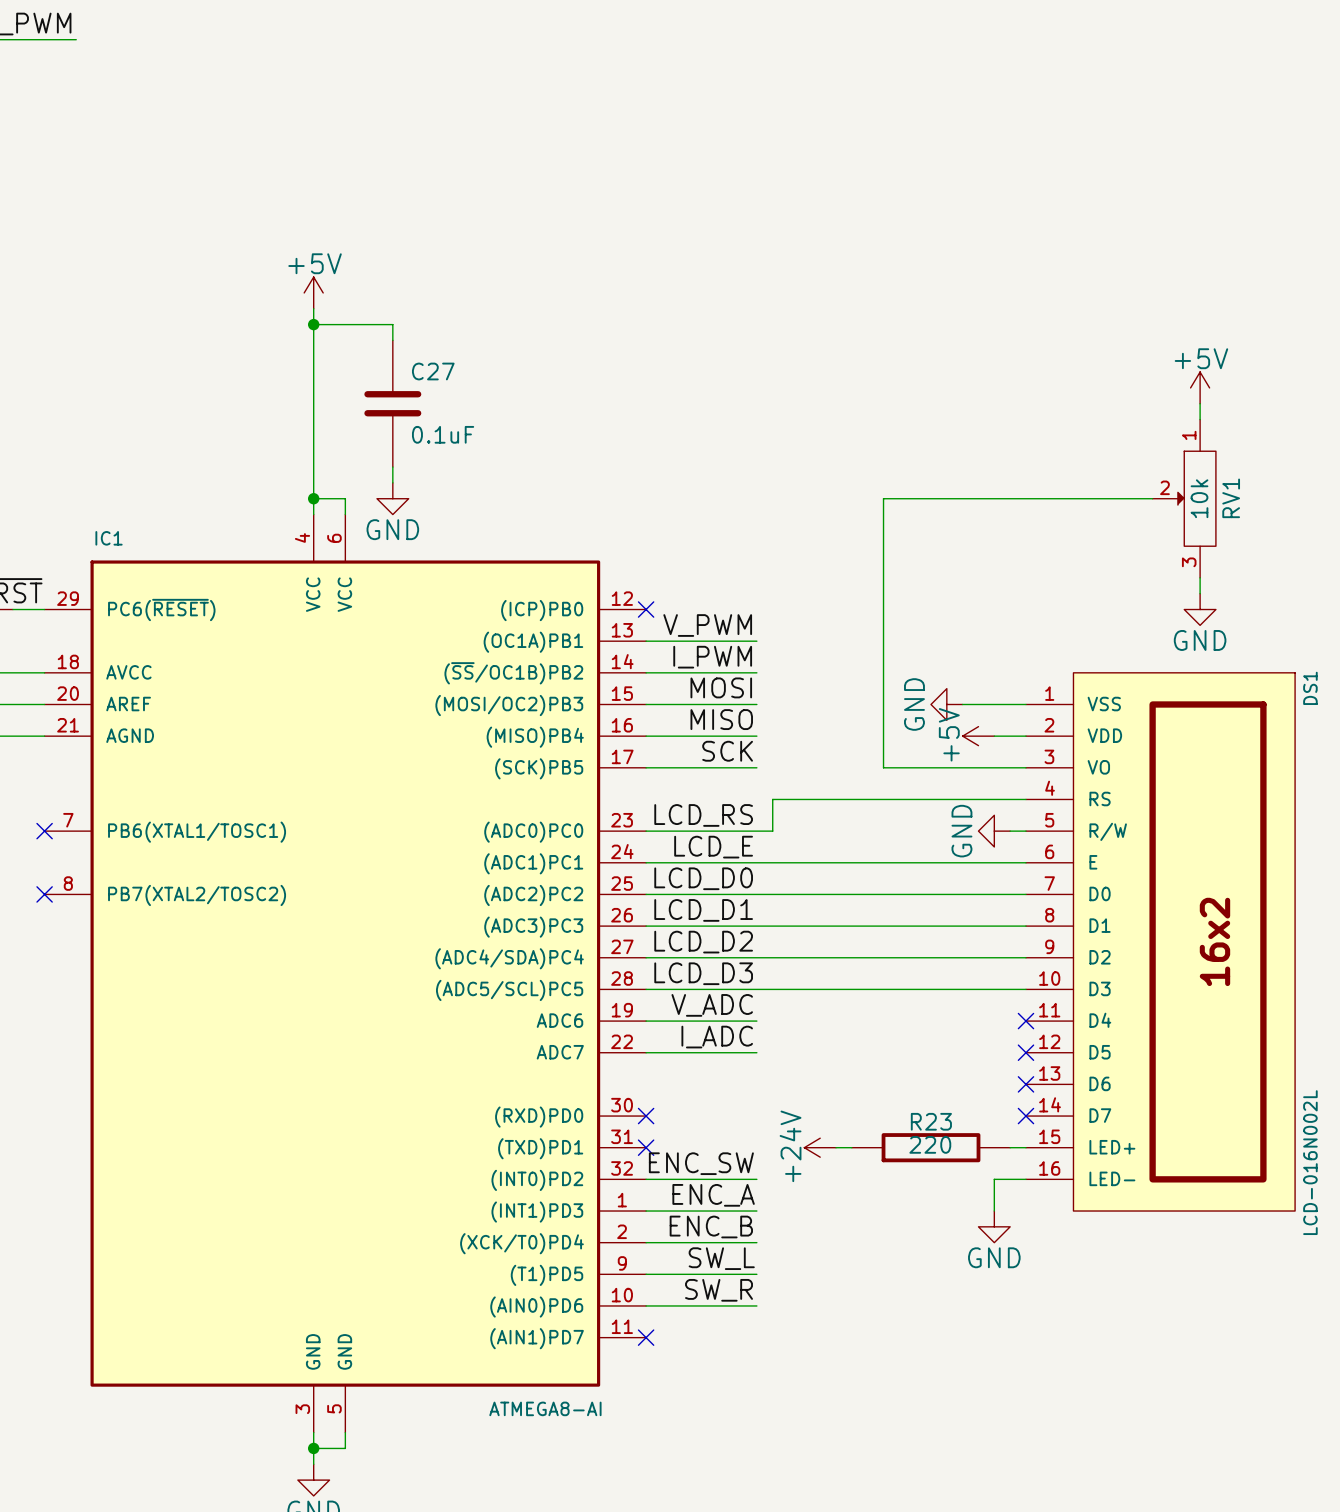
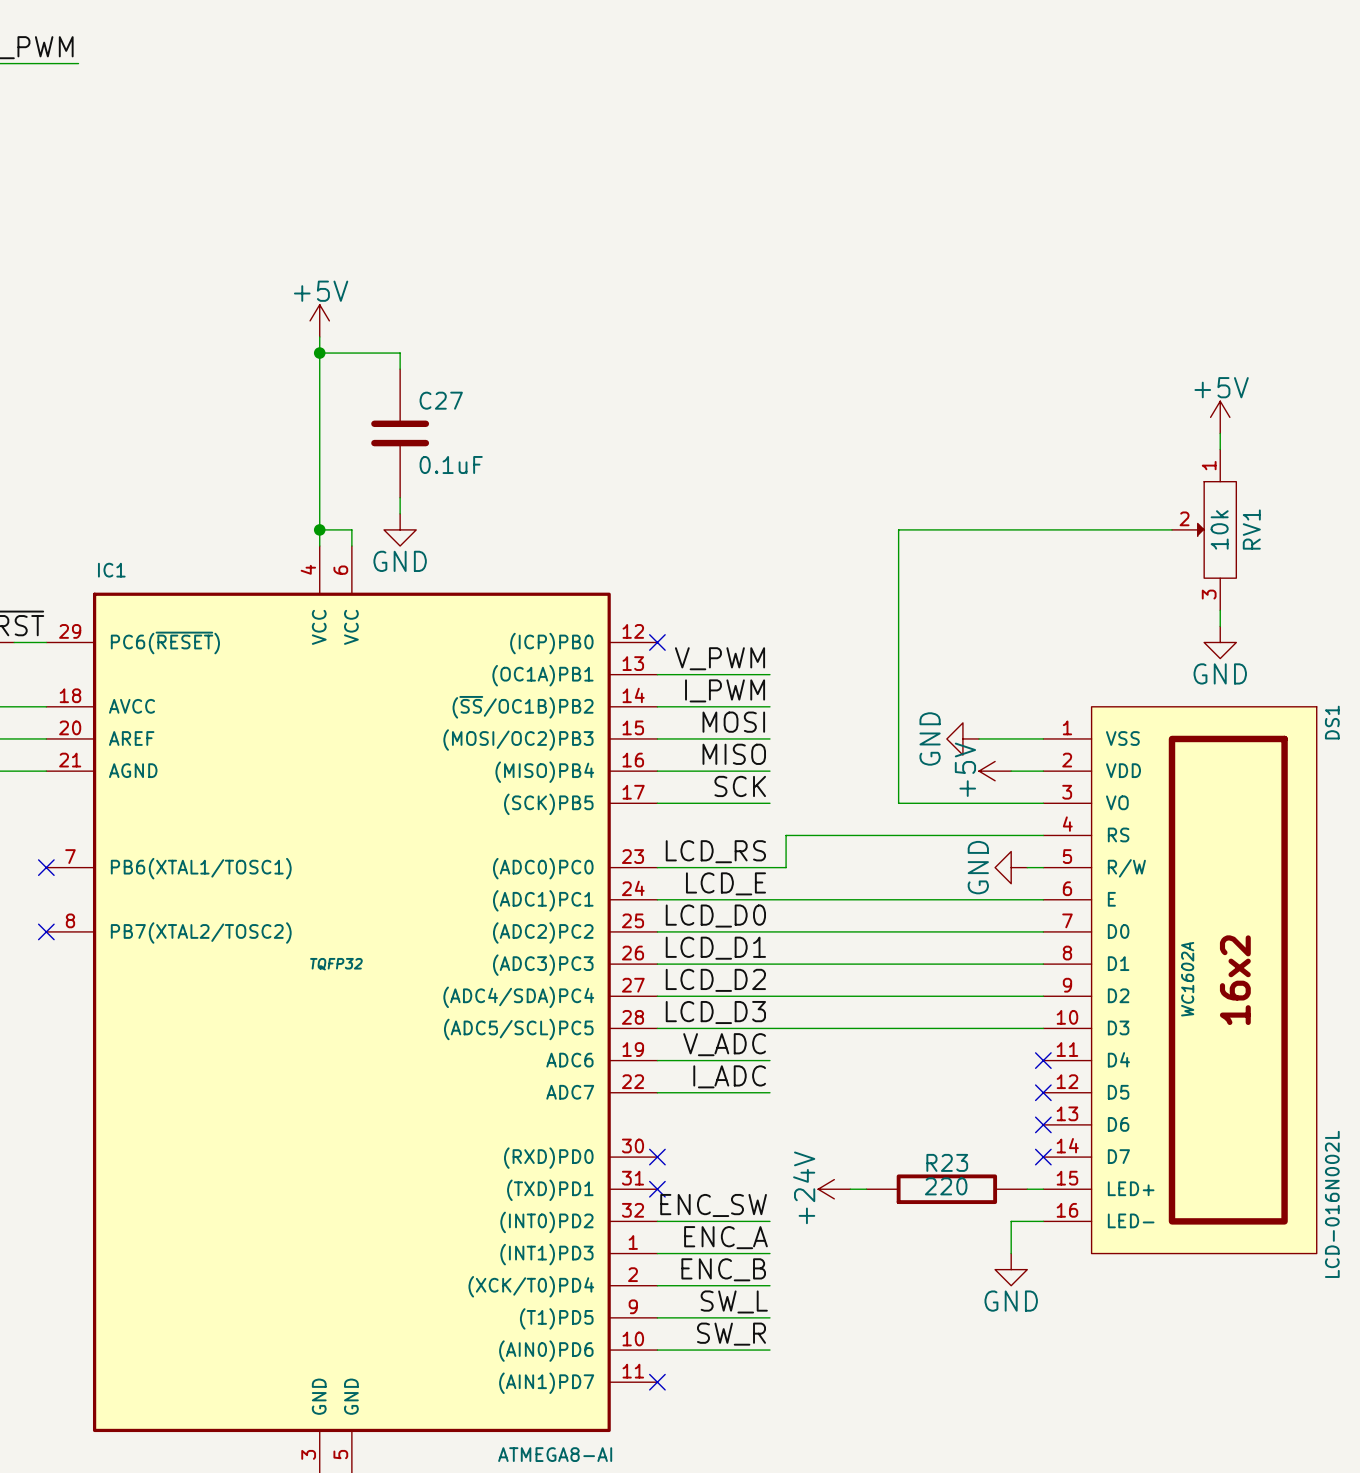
IC1 text: none -> TQFP32 (336, 964)
DS1 text: none -> WC1602A (1187, 979)

